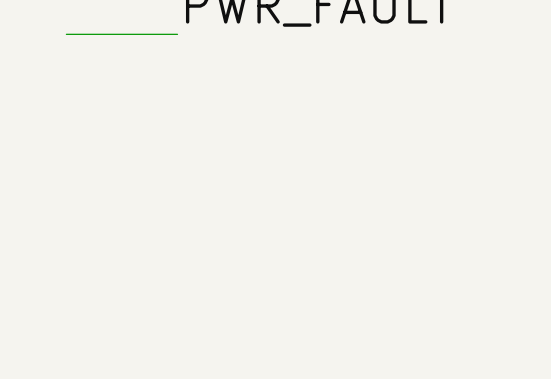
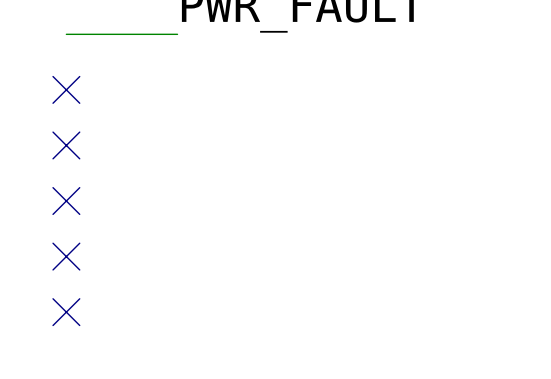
no-connect mark: none -> (66, 89)
no-connect mark: none -> (66, 145)
no-connect mark: none -> (66, 201)
no-connect mark: none -> (66, 256)
no-connect mark: none -> (66, 312)

